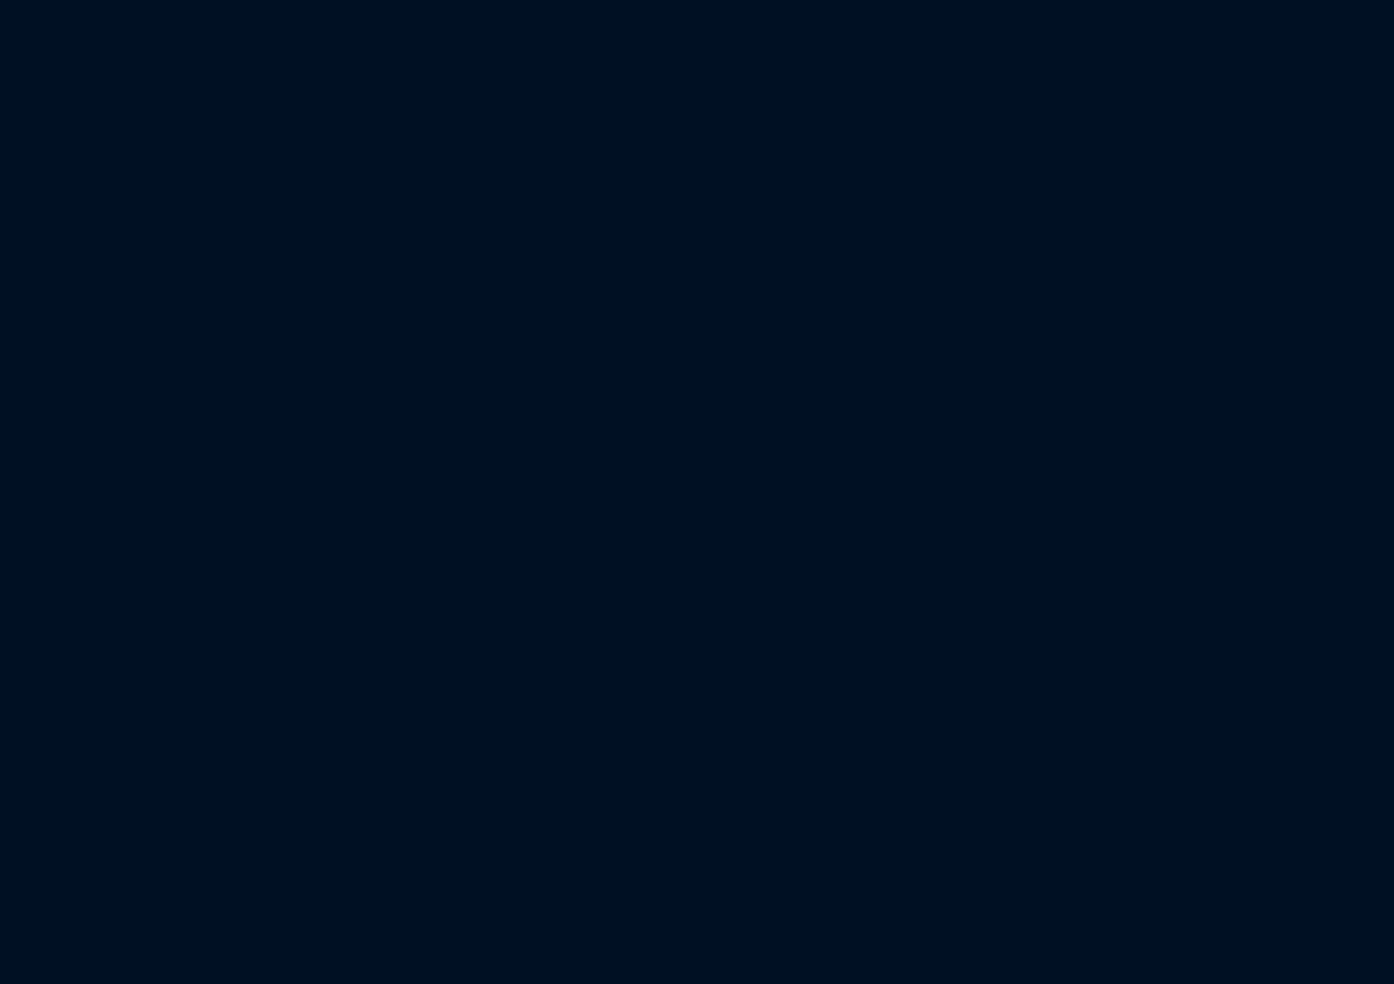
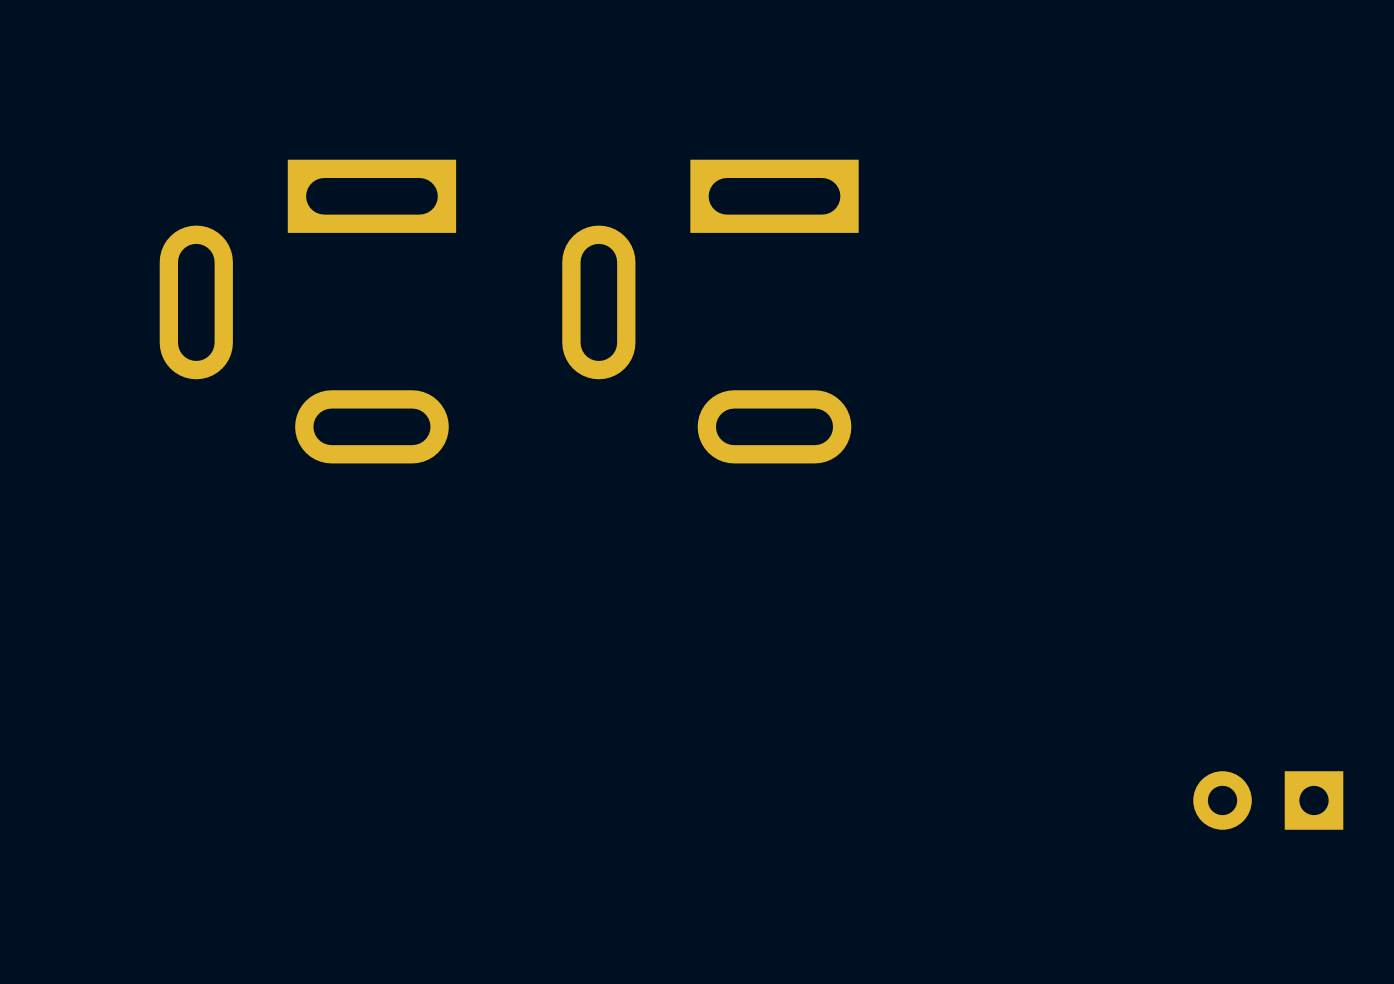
part: none -> (307, 311)
part: none -> (710, 311)
part: none -> (1268, 800)

